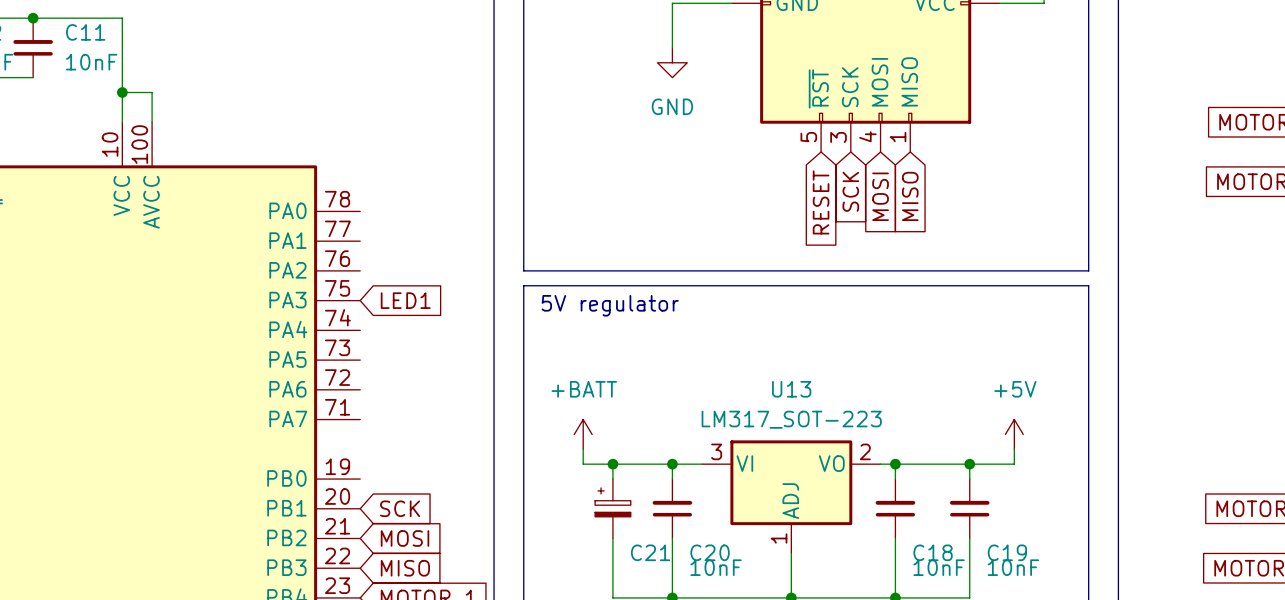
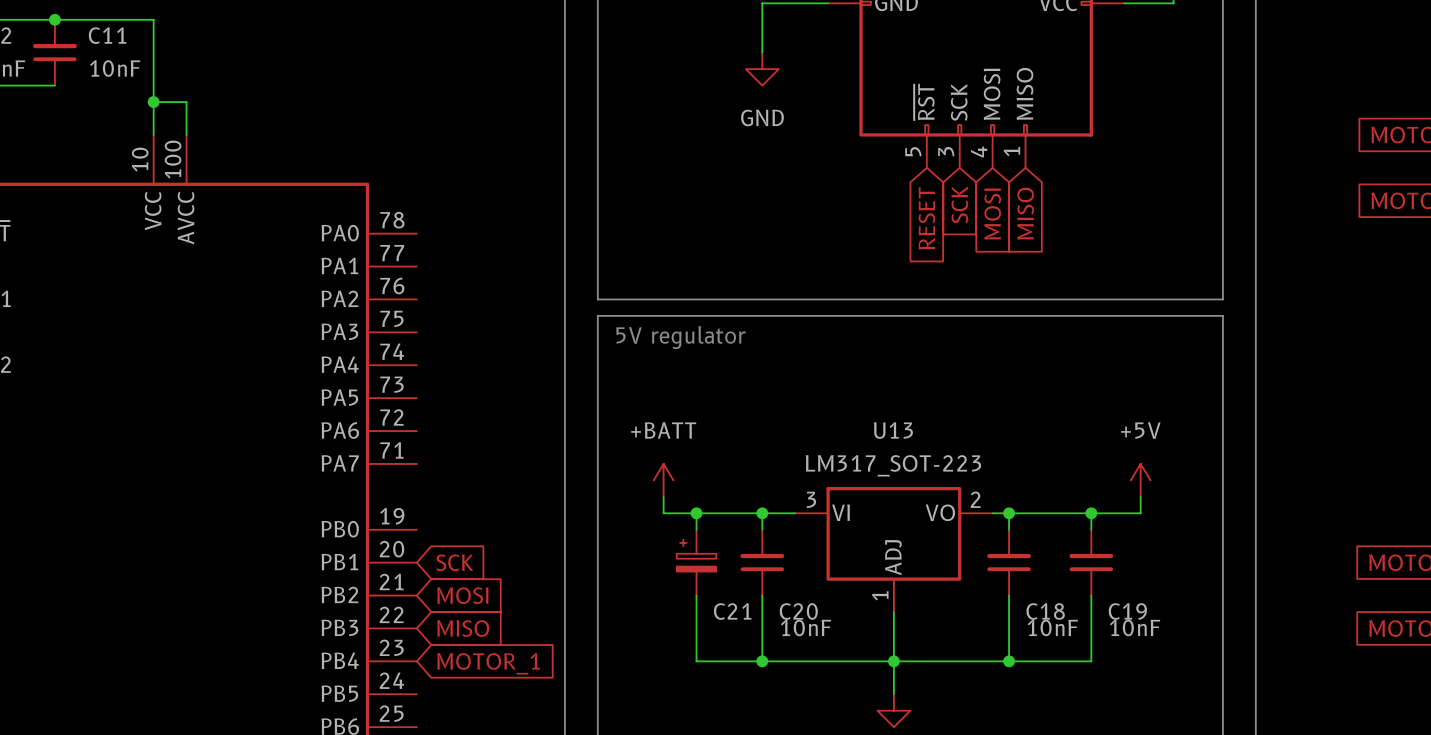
global label: LED1 (405, 300) -> none

